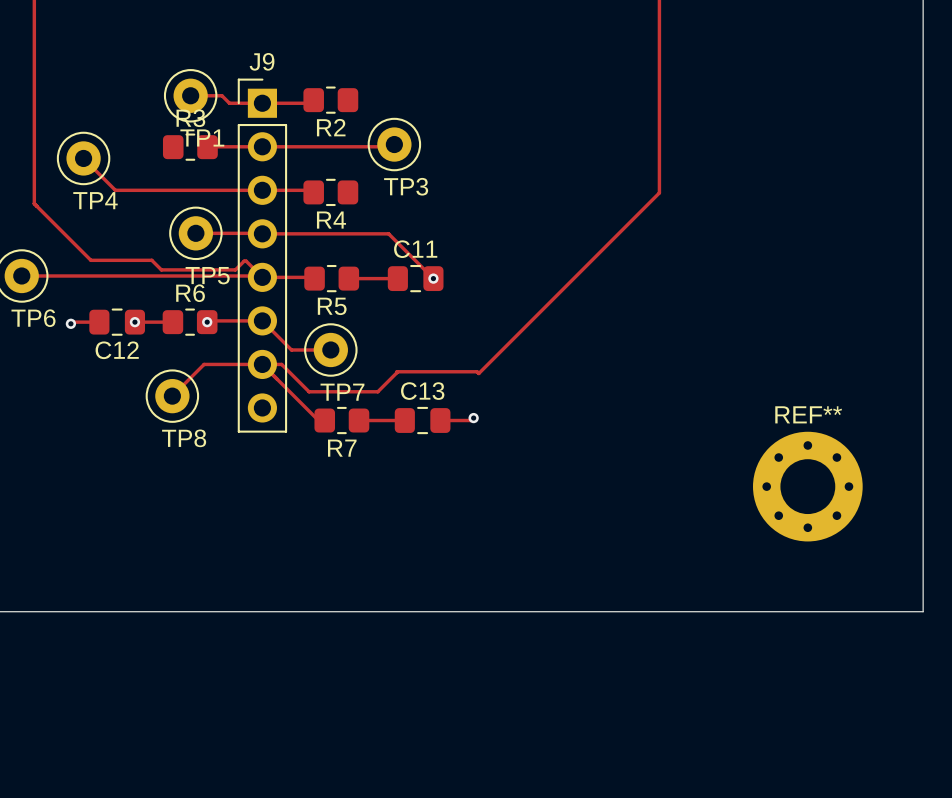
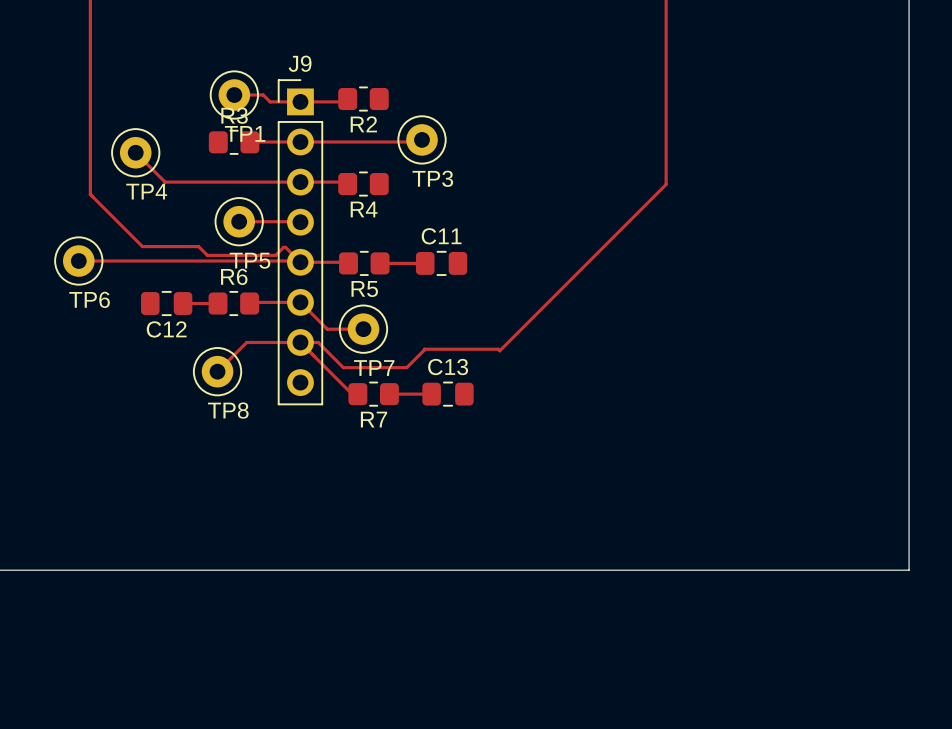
track: (262, 233) (388, 233) (433, 278) -> none
via: (433, 278) -> none
track: (99, 322) (72, 322) (70, 323) -> none
via: (134, 322) -> none
via: (207, 322) -> none
via: (70, 323) -> none
track: (473, 418) (471, 420) (440, 420) -> none
via: (473, 418) -> none
REF**: (807, 486) -> none

